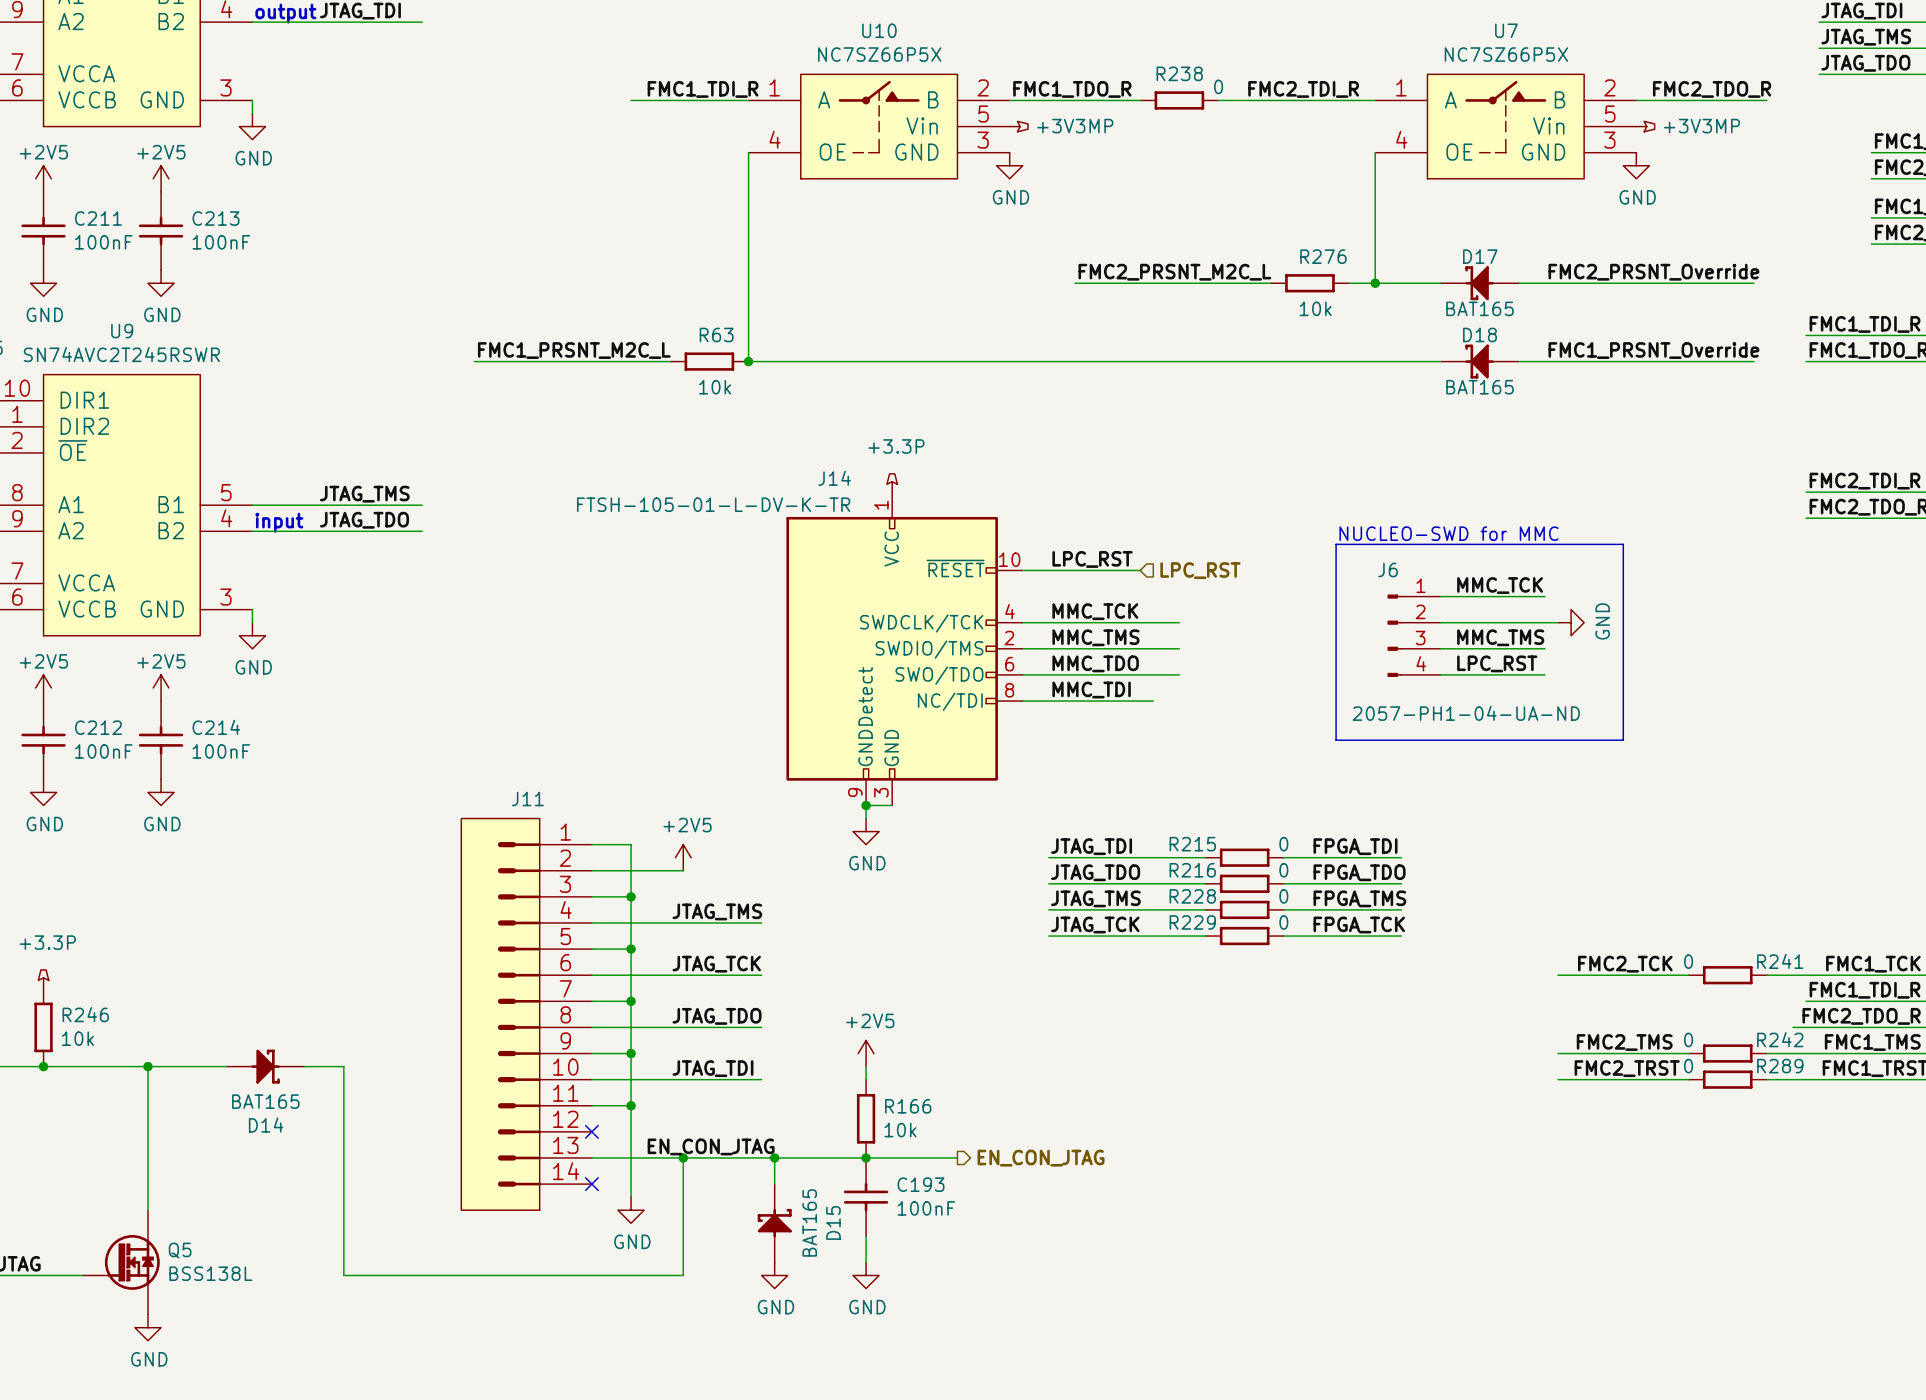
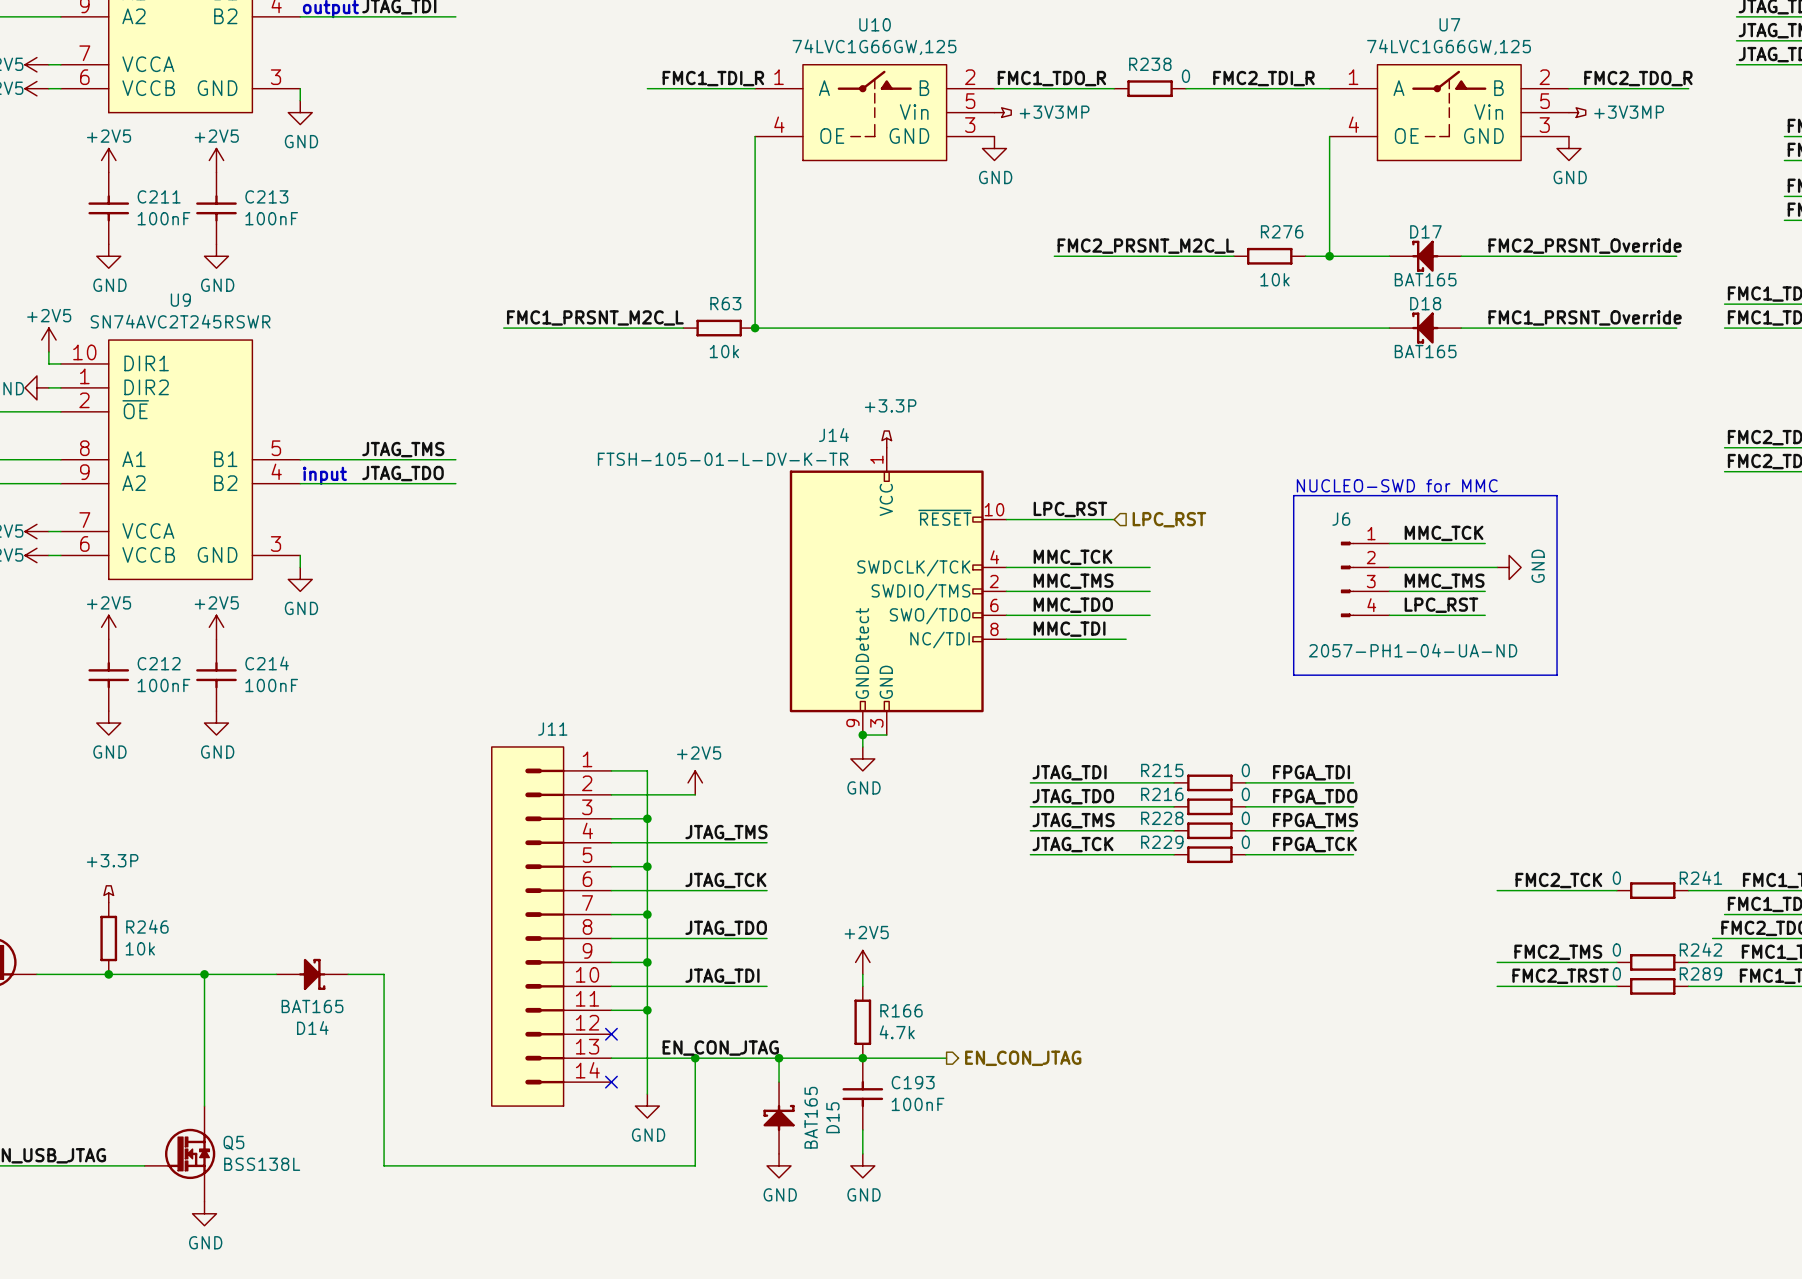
U10 value: NC7SZ66P5X (879, 54) -> 74LVC1G66GW,125 (874, 47)
U7 value: NC7SZ66P5X (1506, 54) -> 74LVC1G66GW,125 (1449, 47)
R166 text: 10k (900, 1130) -> 4.7k (897, 1032)

